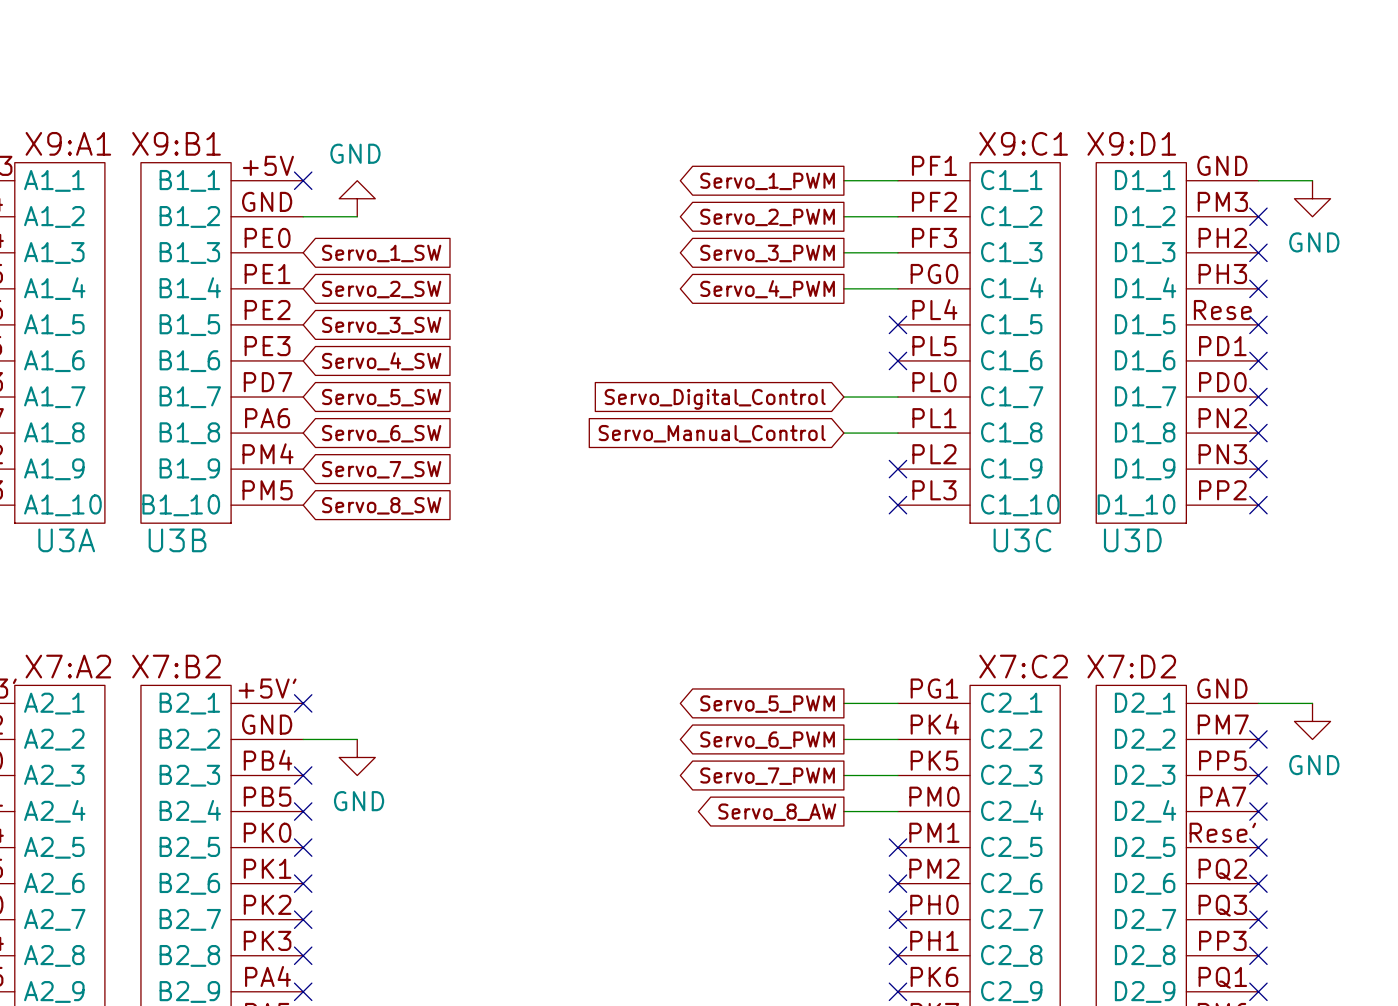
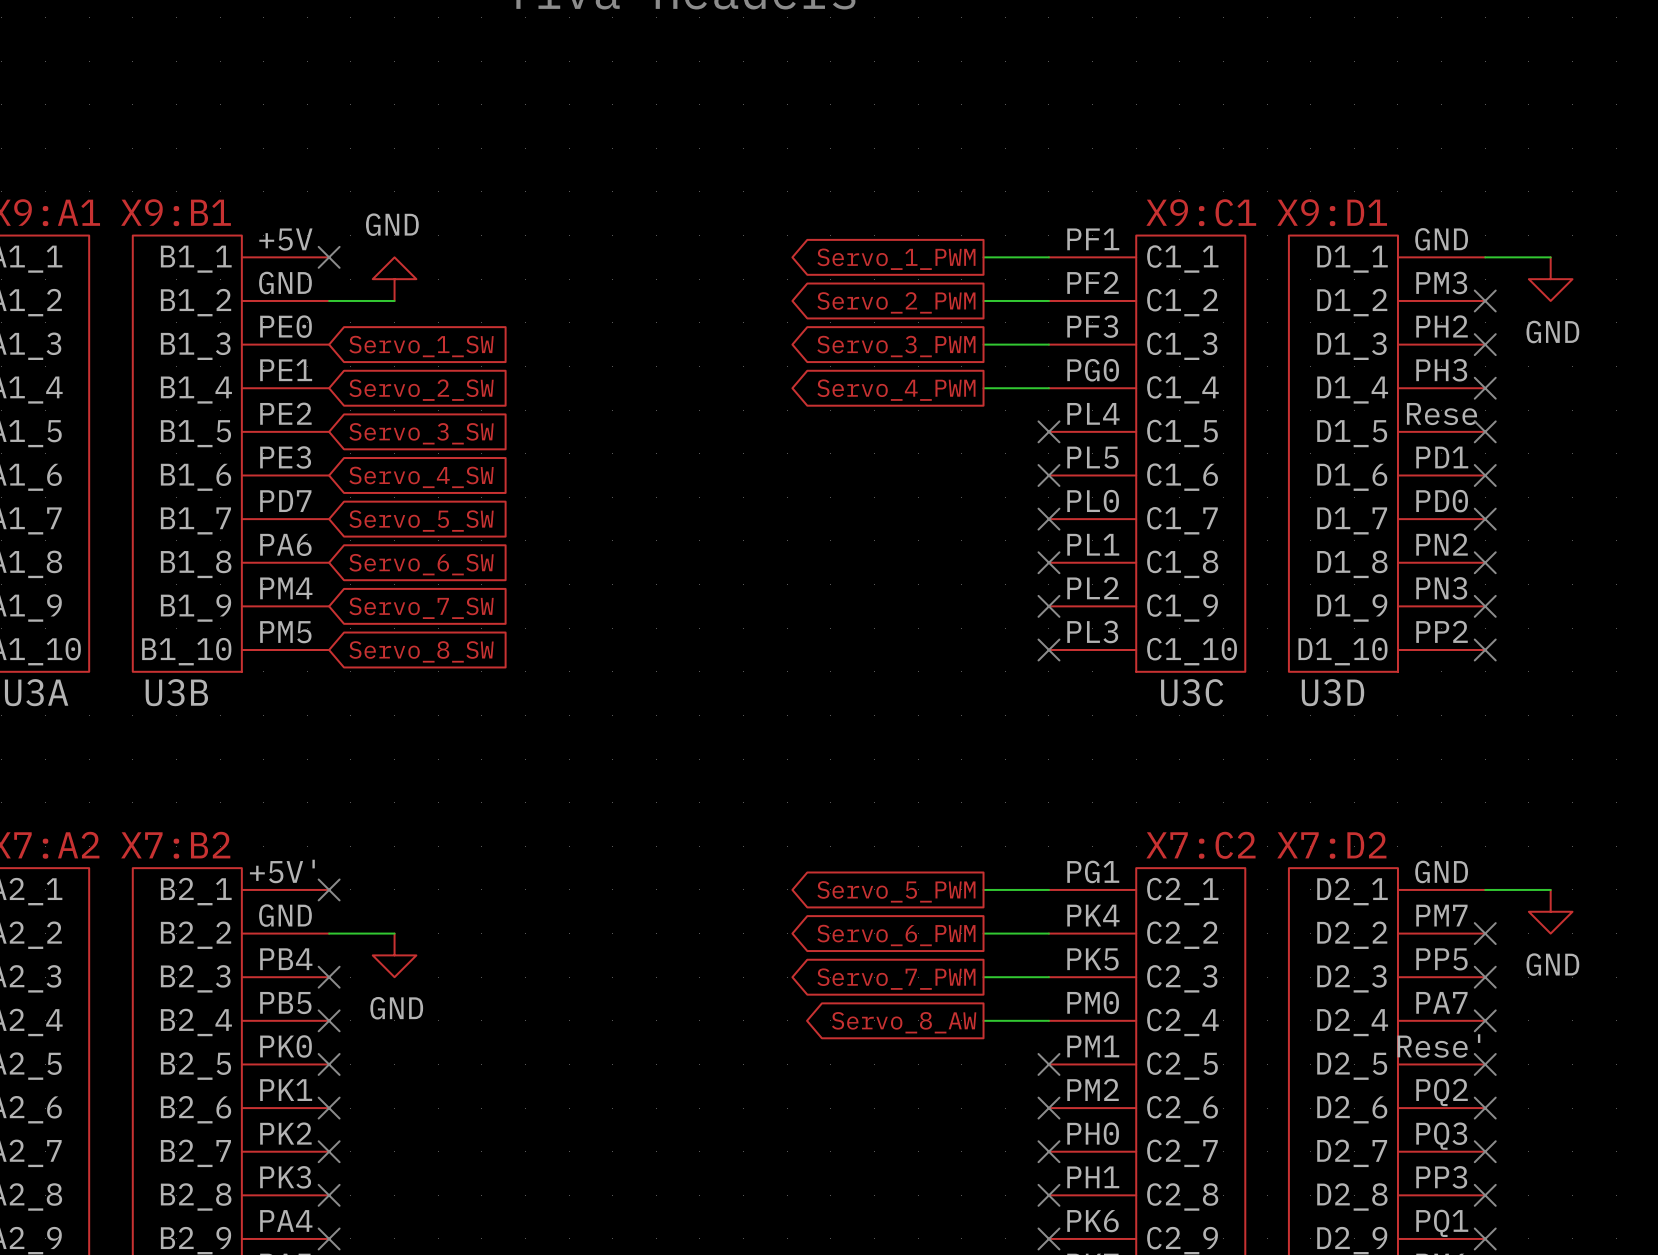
wire: (843, 397) (897, 397) -> none
no-connect mark: none -> (1048, 519)
global label: Servo_Digital_Control (715, 399) -> none
global label: Servo_Manual_Control (712, 433) -> none
wire: (843, 433) (897, 433) -> none
no-connect mark: none -> (1048, 562)

